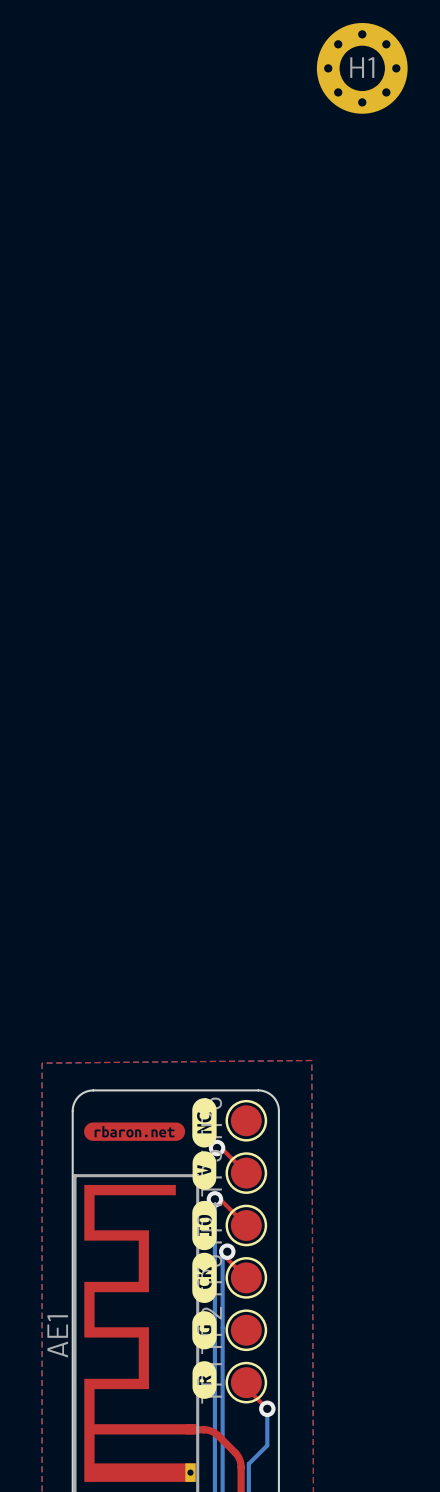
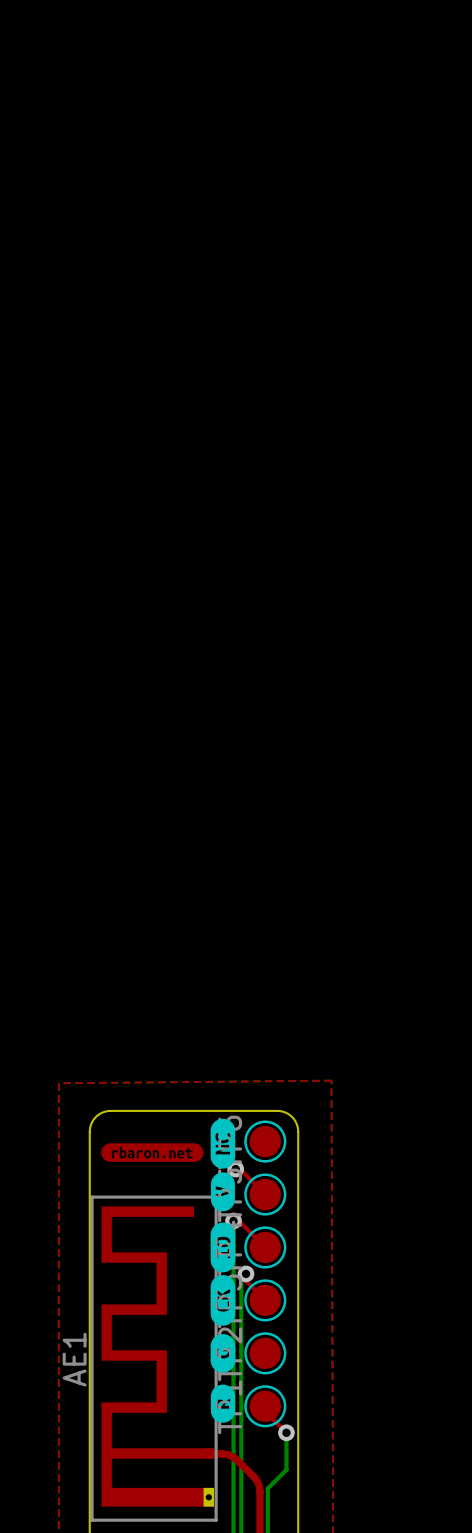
H1: (362, 68) -> none

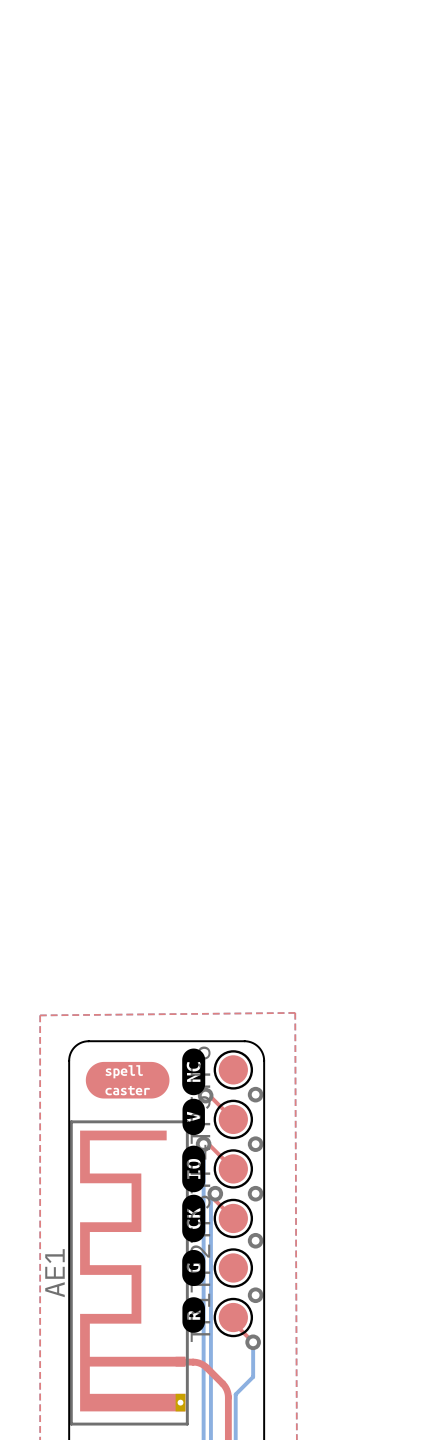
drawing shape: [101, 1143, 204, 1162] -> [85, 1061, 170, 1099]
via: none -> (255, 1094)
via: none -> (255, 1144)
via: none -> (255, 1193)
via: none -> (255, 1240)
via: none -> (255, 1295)

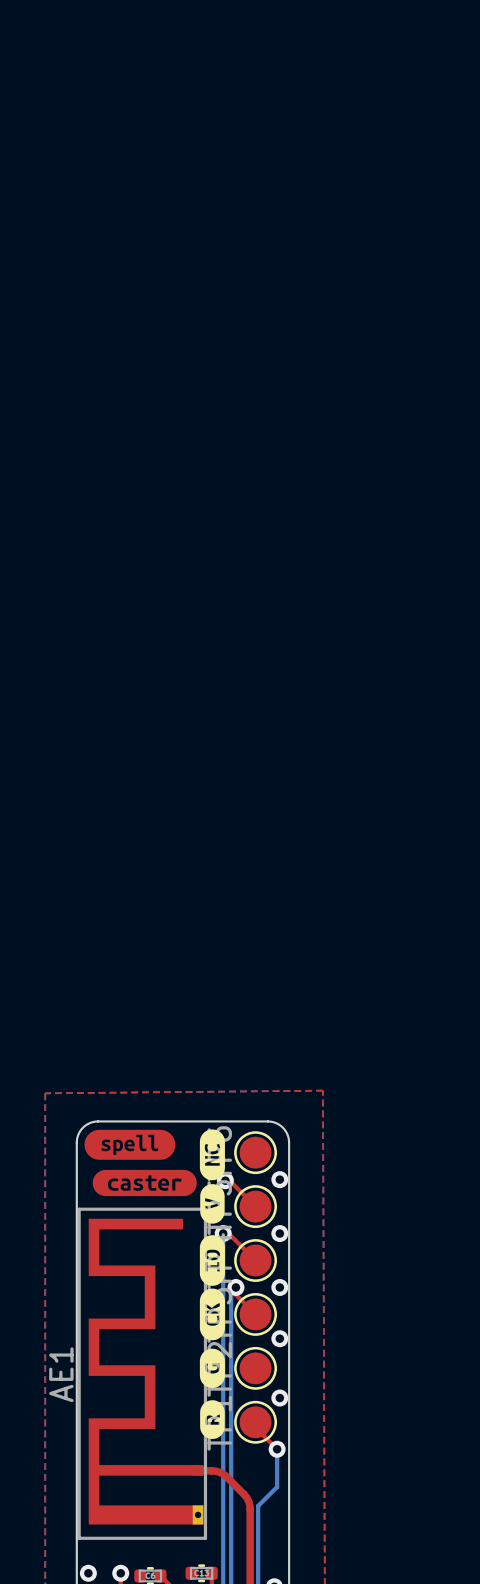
drawing: none -> [84, 1129, 197, 1197]
drawing: [85, 1061, 170, 1099] -> none

